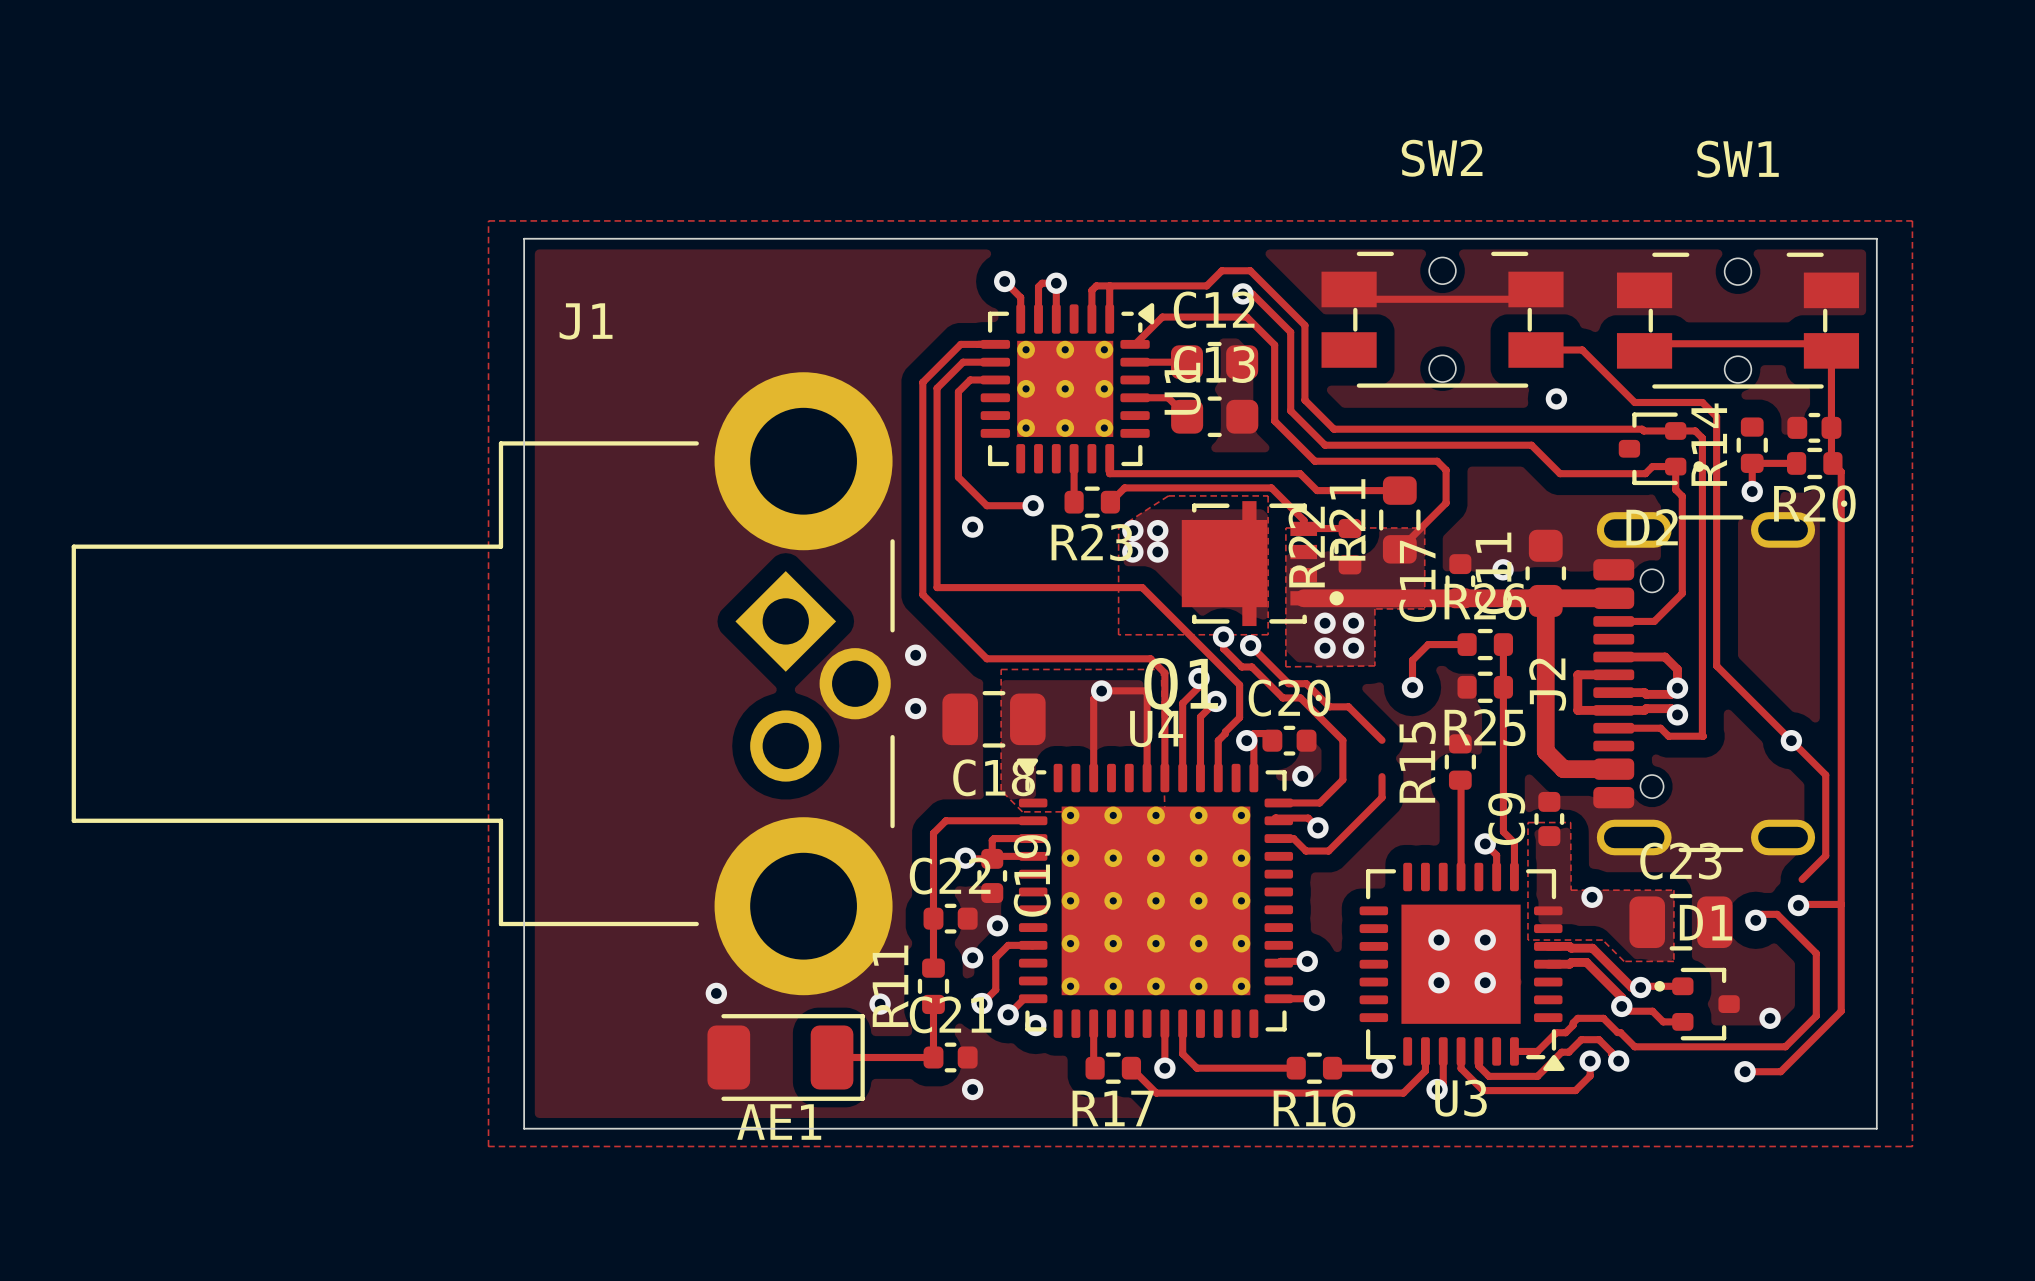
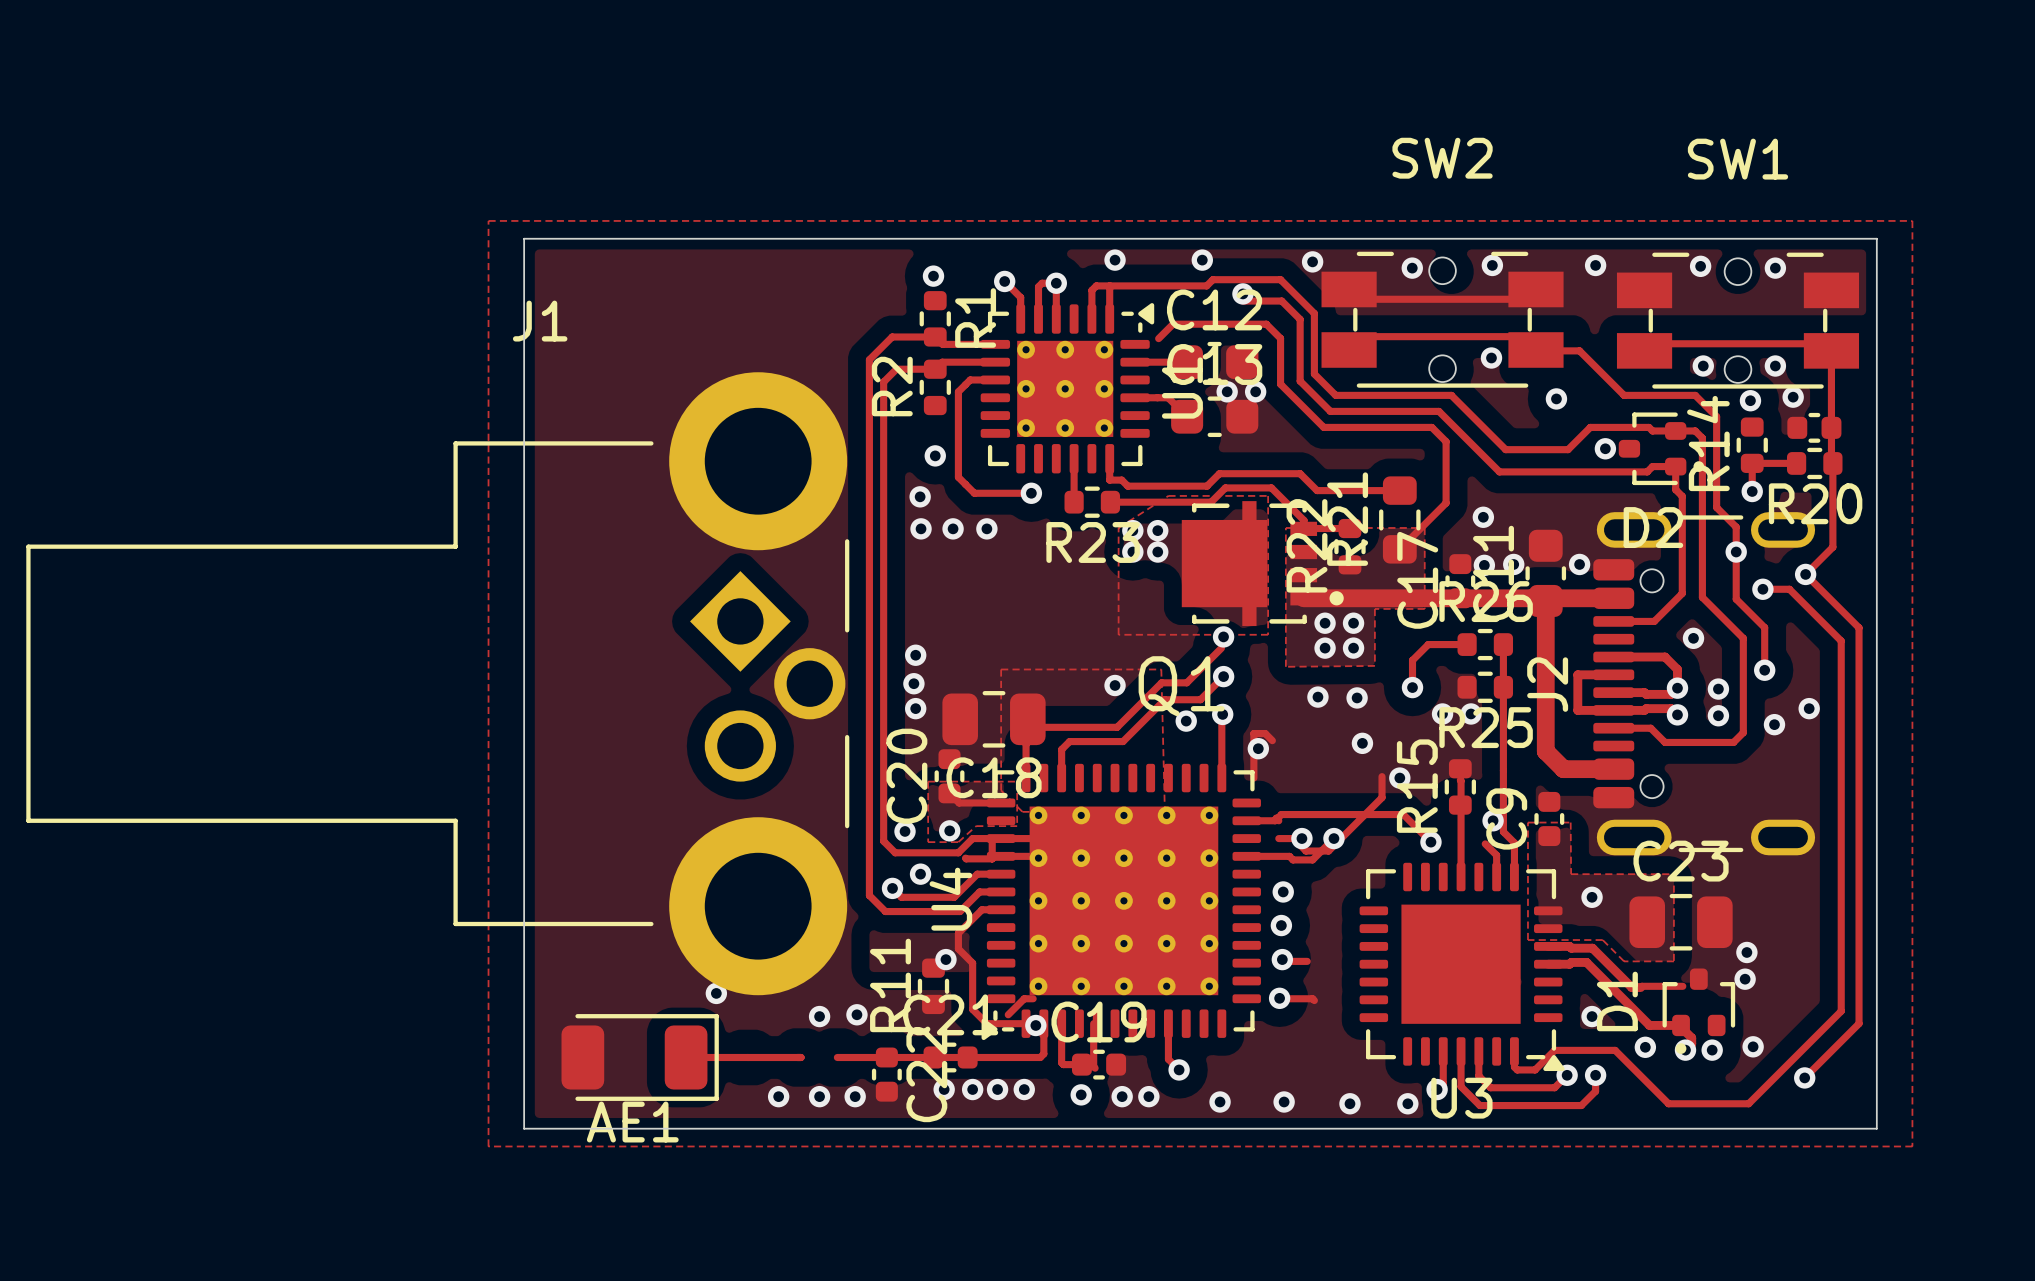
via: none -> (1115, 260)
via: none -> (1202, 260)
via: none -> (1312, 261)
via: none -> (1492, 265)
via: none -> (1595, 265)
via: none -> (1700, 266)
via: none -> (1412, 268)
via: none -> (1775, 268)
via: none -> (933, 276)
track: (1212, 279) (1221, 270) (1250, 270) (1304, 325) (1304, 400) (1333, 429) (1642, 429) (1652, 430) -> (1212, 279) (1280, 279) (1314, 313) (1314, 374) (1335, 395) (1451, 395) (1505, 449) (1568, 449) (1590, 427) (1649, 427) (1652, 430)
track: (1242, 293) (1252, 293) (1290, 332) (1290, 410) (1325, 445) (1531, 445) (1560, 473) (1645, 473) (1647, 471) -> (1242, 301) (1281, 301) (1300, 319) (1300, 381) (1330, 411) (1438, 411) (1499, 471) (1647, 471)
R1: none -> (935, 318)
track: (960, 344) (922, 382) (922, 594) (986, 658) (1150, 658) (1164, 673) (1164, 778) -> (960, 344) (942, 344) (935, 337) (892, 337) (869, 359) (869, 895) (885, 911) (960, 911) (979, 891) (1001, 891)
track: (1135, 344) (1162, 317) (1246, 317) (1274, 344) (1274, 421) (1314, 461) (1437, 461) (1446, 470) -> (1158, 338) (1173, 324) (1266, 324) (1280, 338) (1280, 384) (1323, 427) (1431, 427) (1446, 441) (1446, 470)
track: (1535, 349) (1582, 349) (1634, 402) (1702, 402) -> (1357, 350) (1372, 336) (1530, 336) (1544, 350) (1579, 350) (1624, 395) (1695, 395) (1702, 402)
via: none -> (1491, 358)
track: (963, 362) (937, 388) (937, 587) (1142, 587) (1239, 684) (1239, 717) (1218, 740) (1218, 778) -> (963, 362) (942, 362) (935, 369) (896, 369) (883, 382) (883, 841) (895, 852) (958, 852) (972, 838) (994, 838)
via: none -> (1703, 366)
via: none -> (1775, 366)
R2: none -> (935, 387)
via: none -> (1227, 391)
via: none -> (1255, 391)
via: none -> (1793, 397)
via: none -> (1750, 400)
via: none -> (1605, 448)
via: none -> (935, 455)
track: (1832, 463) (1841, 471) (1841, 641) -> (1762, 589) (1789, 589) (1841, 641)
track: none -> (1832, 463) (1832, 547) (1805, 574) (1859, 627) (1859, 1023) (1804, 1077)
track: (1109, 473) (1219, 473) -> (1109, 473) (1109, 480) (1121, 480) (1127, 486) (1207, 486) (1219, 473)
track: (1225, 487) (1124, 487) (1110, 502) -> (1225, 487) (1211, 502) (1110, 502)
track: (974, 493) (986, 505) (1033, 505) -> (974, 493) (1031, 493)
via: none -> (920, 496)
via position: (1033, 505) -> (1031, 493)
track: (1716, 507) (1716, 665) (1825, 775) (1825, 855) (1802, 879) -> (1716, 507) (1736, 527) (1736, 599) (1764, 627) (1764, 670)
via: none -> (1483, 517)
via: (972, 527) -> none
via: none -> (921, 528)
via: none -> (953, 528)
via: none -> (986, 528)
via: none -> (1736, 552)
via: none -> (1513, 564)
via: none -> (1579, 564)
via: none -> (1484, 565)
via: (1503, 569) -> none
via: none -> (1805, 574)
via: none -> (1762, 589)
track: (1702, 597) (1703, 736) (1668, 736) (1660, 728) (1650, 728) -> (1702, 597) (1743, 638) (1743, 732) (1733, 742) (1665, 742) (1650, 728)
track: (1223, 636) (1223, 648) (1241, 666) (1251, 666) (1282, 697) (1300, 697) (1342, 740) (1342, 779) (1319, 802) (1278, 802) -> none
via: none -> (1693, 638)
track: (1250, 645) (1288, 683) (1306, 683) (1329, 706) (1348, 706) (1382, 740) -> none
via: (1250, 645) -> none
track: none -> (1221, 648) (1186, 682) (1161, 682) (1117, 727) (1042, 727) (1026, 744) (1026, 778)
via: none -> (1764, 670)
track: none -> (1223, 676) (1200, 699) (1164, 699) (1123, 741) (1069, 741) (1061, 749) (1061, 778)
via: none -> (1223, 676)
track: (1199, 678) (1199, 686) (1182, 703) (1182, 778) -> none
via: (1199, 678) -> none
J1 position: (483, 683) -> (437, 683)
via: none -> (913, 683)
via: none -> (1718, 689)
via position: (1101, 691) -> (1115, 685)
via: none -> (1317, 697)
via: none -> (1357, 697)
track: (1215, 701) (1200, 716) (1200, 778) -> none
via position: (1215, 701) -> (1222, 714)
via: none -> (1809, 708)
via: none -> (1442, 713)
via: none -> (1471, 713)
track: none -> (1222, 714) (1221, 778)
via: none -> (1718, 715)
via: none -> (1186, 721)
via position: (1246, 740) -> (1258, 748)
C20 rotation: 0° (1289, 740) -> 90° clockwise (949, 776)
C20 position: (1289, 740) -> (949, 776)
via position: (1791, 740) -> (1774, 724)
via: none -> (1362, 743)
R15 position: (1460, 762) -> (1460, 786)
via: (1302, 776) -> none
track: (1093, 778) (1093, 699) (1101, 690) (1147, 690) (1147, 778) -> none
via: none -> (1399, 778)
zone outline: none -> (928, 781) (928, 842) (958, 842) (976, 826) (1017, 826) (1017, 781) (928, 781)
track: none -> (949, 793) (959, 802) (1001, 802)
track: (1275, 818) (1308, 818) (1317, 827) -> none
track: (1033, 820) (945, 820) (933, 833) (933, 968) -> none
track: none -> (1246, 820) (1275, 820) (1281, 814) (1403, 814) (1430, 842)
zone outline: (1570, 822) (1571, 890) (1673, 890) -> (1570, 822) (1571, 874) (1673, 874) (1673, 890)
via: (1317, 827) -> none
via: none -> (949, 830)
via: none -> (905, 831)
via: none -> (1301, 838)
track: none -> (1333, 838) (1312, 859) (1293, 859) (1289, 856) (1246, 856)
via: none -> (1333, 838)
via: none -> (1430, 842)
via position: (1485, 843) -> (1493, 820)
via: (965, 858) -> none
via: none -> (920, 874)
track: none -> (1001, 874) (977, 874) (954, 897) (901, 897) (892, 888)
C19 rotation: 0° (992, 875) -> 90° clockwise (1099, 1064)
C19 position: (992, 875) -> (1099, 1064)
via: none -> (892, 888)
via: none -> (1283, 891)
U4 rotation: 0° (1154, 898) -> 90° counterclockwise (1121, 901)
track: (1841, 904) (1798, 905) -> none
via: (1798, 905) -> none
track: none -> (1001, 909) (982, 909) (958, 933) (958, 948) (972, 963) (972, 1009) (986, 1023) (1026, 1023)
C22 rotation: 0° (950, 918) -> 90° clockwise (886, 1074)
C22 position: (950, 918) -> (886, 1074)
track: (1755, 920) (1761, 914) (1777, 914) (1816, 953) (1816, 1016) (1785, 1046) (1634, 1046) (1603, 1018) (1577, 1018) (1565, 1032) (1556, 1032) (1537, 1051) (1514, 1051) -> (1780, 1071) (1748, 1103) (1668, 1103) (1615, 1050) (1554, 1050) (1535, 1069) (1517, 1069) (1514, 1067) (1514, 1051)
via: (1755, 920) -> none
via: (997, 925) -> none
via: none -> (1281, 925)
via: (1438, 940) -> none
via: (1485, 940) -> none
track: (1032, 946) (1008, 945) (995, 957) (995, 989) (982, 1003) -> none
via: none -> (1746, 952)
via position: (972, 957) -> (945, 959)
via: none -> (1282, 959)
via: (1307, 961) -> none
via: none -> (1745, 979)
via: (1438, 982) -> none
via: (1485, 982) -> none
via: (1640, 987) -> none
track: (1621, 997) (1621, 1006) (1626, 1011) (1652, 1011) (1663, 1021) (1682, 1021) -> (1621, 997) (1649, 1025) (1681, 1025) (1691, 1037) (1691, 1043) (1685, 1050)
via: none -> (1279, 998)
via: (1314, 1000) -> none
via: (982, 1003) -> none
via position: (880, 1004) -> (856, 1014)
track: (933, 1004) (933, 1057) -> (1043, 1023) (1043, 1053) (1040, 1057) (933, 1057)
D1 rotation: 0° (1697, 1004) -> 90° counterclockwise (1698, 1011)
via: (1621, 1006) -> none
via: (1008, 1014) -> none
via: none -> (819, 1016)
via: none -> (1592, 1016)
via: (1770, 1018) -> none
track: none -> (1061, 1023) (1061, 1062) (1063, 1064) (1081, 1064)
track: (1164, 1023) (1164, 1068) -> none
track: none -> (1168, 1023) (1168, 1059) (1179, 1069)
track: (1182, 1023) (1182, 1053) (1196, 1068) (1296, 1068) -> none
via: none -> (1753, 1046)
via: none -> (1645, 1047)
via: none -> (1685, 1050)
via: none -> (1712, 1050)
track: (1425, 1051) (1425, 1071) (1403, 1093) (1156, 1093) (1131, 1068) -> none
track: none -> (686, 1057) (801, 1057)
AE1 position: (786, 1057) -> (640, 1057)
track: (1590, 1061) (1590, 1075) (1575, 1090) (1483, 1090) (1461, 1068) -> (1595, 1075) (1595, 1091) (1581, 1105) (1479, 1105) (1461, 1086) (1461, 1068)
via position: (1590, 1061) -> (1595, 1075)
track: (1618, 1061) (1599, 1039) (1581, 1039) (1568, 1052) (1561, 1052) (1537, 1076) (1489, 1076) (1478, 1066) -> (1567, 1075) (1554, 1087) (1490, 1087) (1478, 1076) (1478, 1066)
via: (1618, 1061) -> none
R17: (1113, 1068) -> none
via position: (1164, 1068) -> (1179, 1069)
R16: (1314, 1068) -> none
track: (1332, 1068) (1382, 1068) -> none
via: (1382, 1068) -> none
track: (1745, 1071) (1780, 1071) -> none
via: (1745, 1071) -> none
via: none -> (1567, 1075)
via: none -> (1804, 1077)
via: none -> (944, 1089)
via: none -> (997, 1089)
via: none -> (1024, 1089)
via: none -> (1081, 1094)
via: none -> (778, 1096)
via: none -> (819, 1096)
via: none -> (855, 1096)
via: none -> (1122, 1096)
via: none -> (1148, 1096)
via: none -> (1220, 1101)
via: none -> (1284, 1101)
via: none -> (1349, 1103)
via: none -> (1407, 1103)

